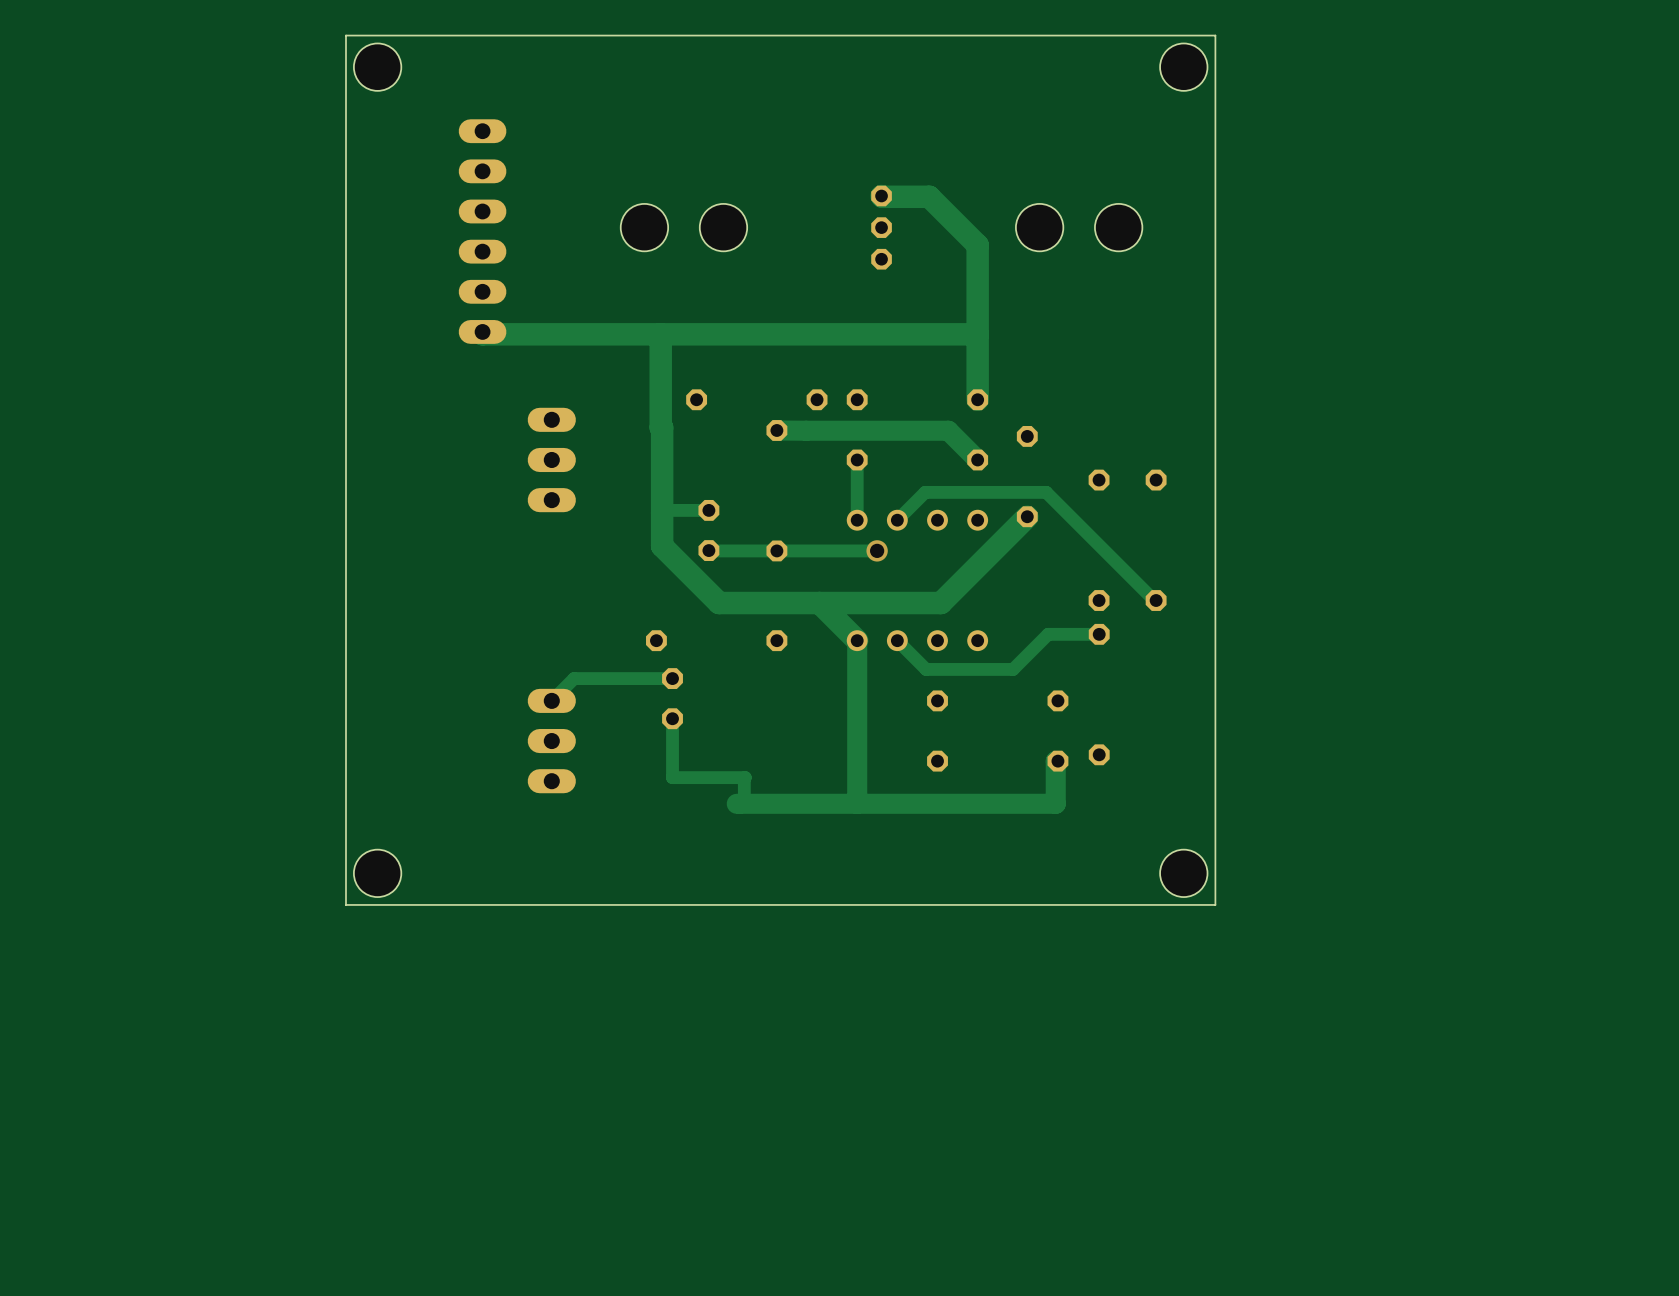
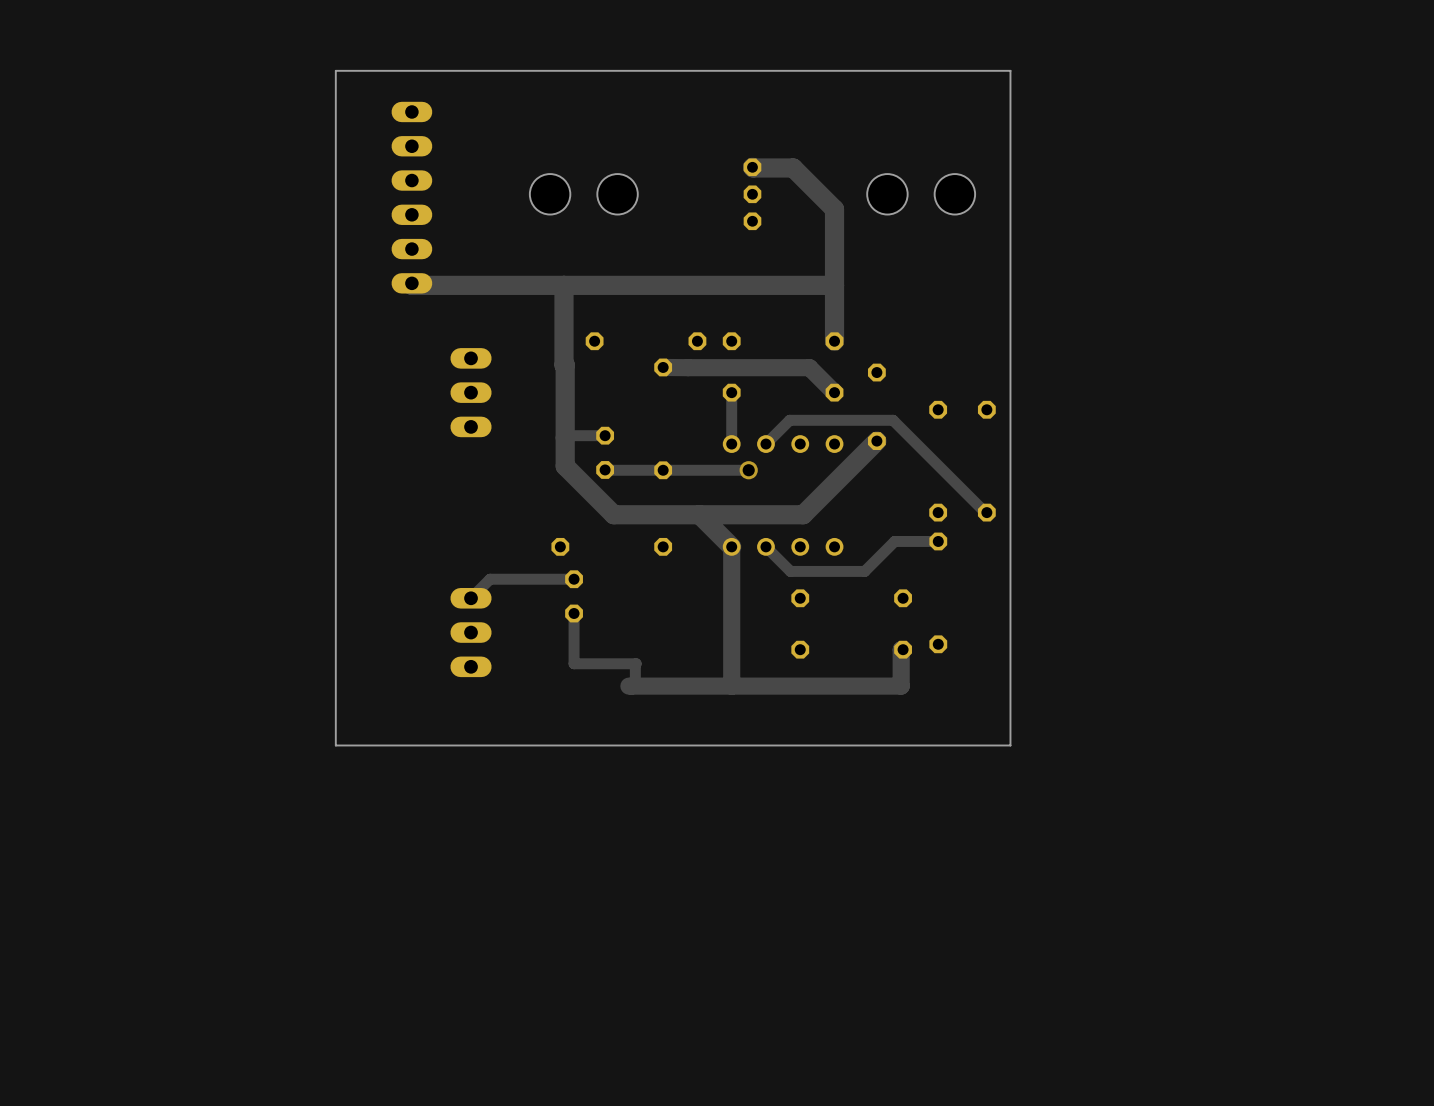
board edge: (1215, 35) (345, 35) (345, 904) (1215, 904) (1215, 35) -> (1010, 70) (1010, 745) (335, 745) (335, 70) (1010, 70)
hole: (377, 67) -> none
hole: (1183, 67) -> none
hole: (377, 873) -> none
hole: (1183, 873) -> none

